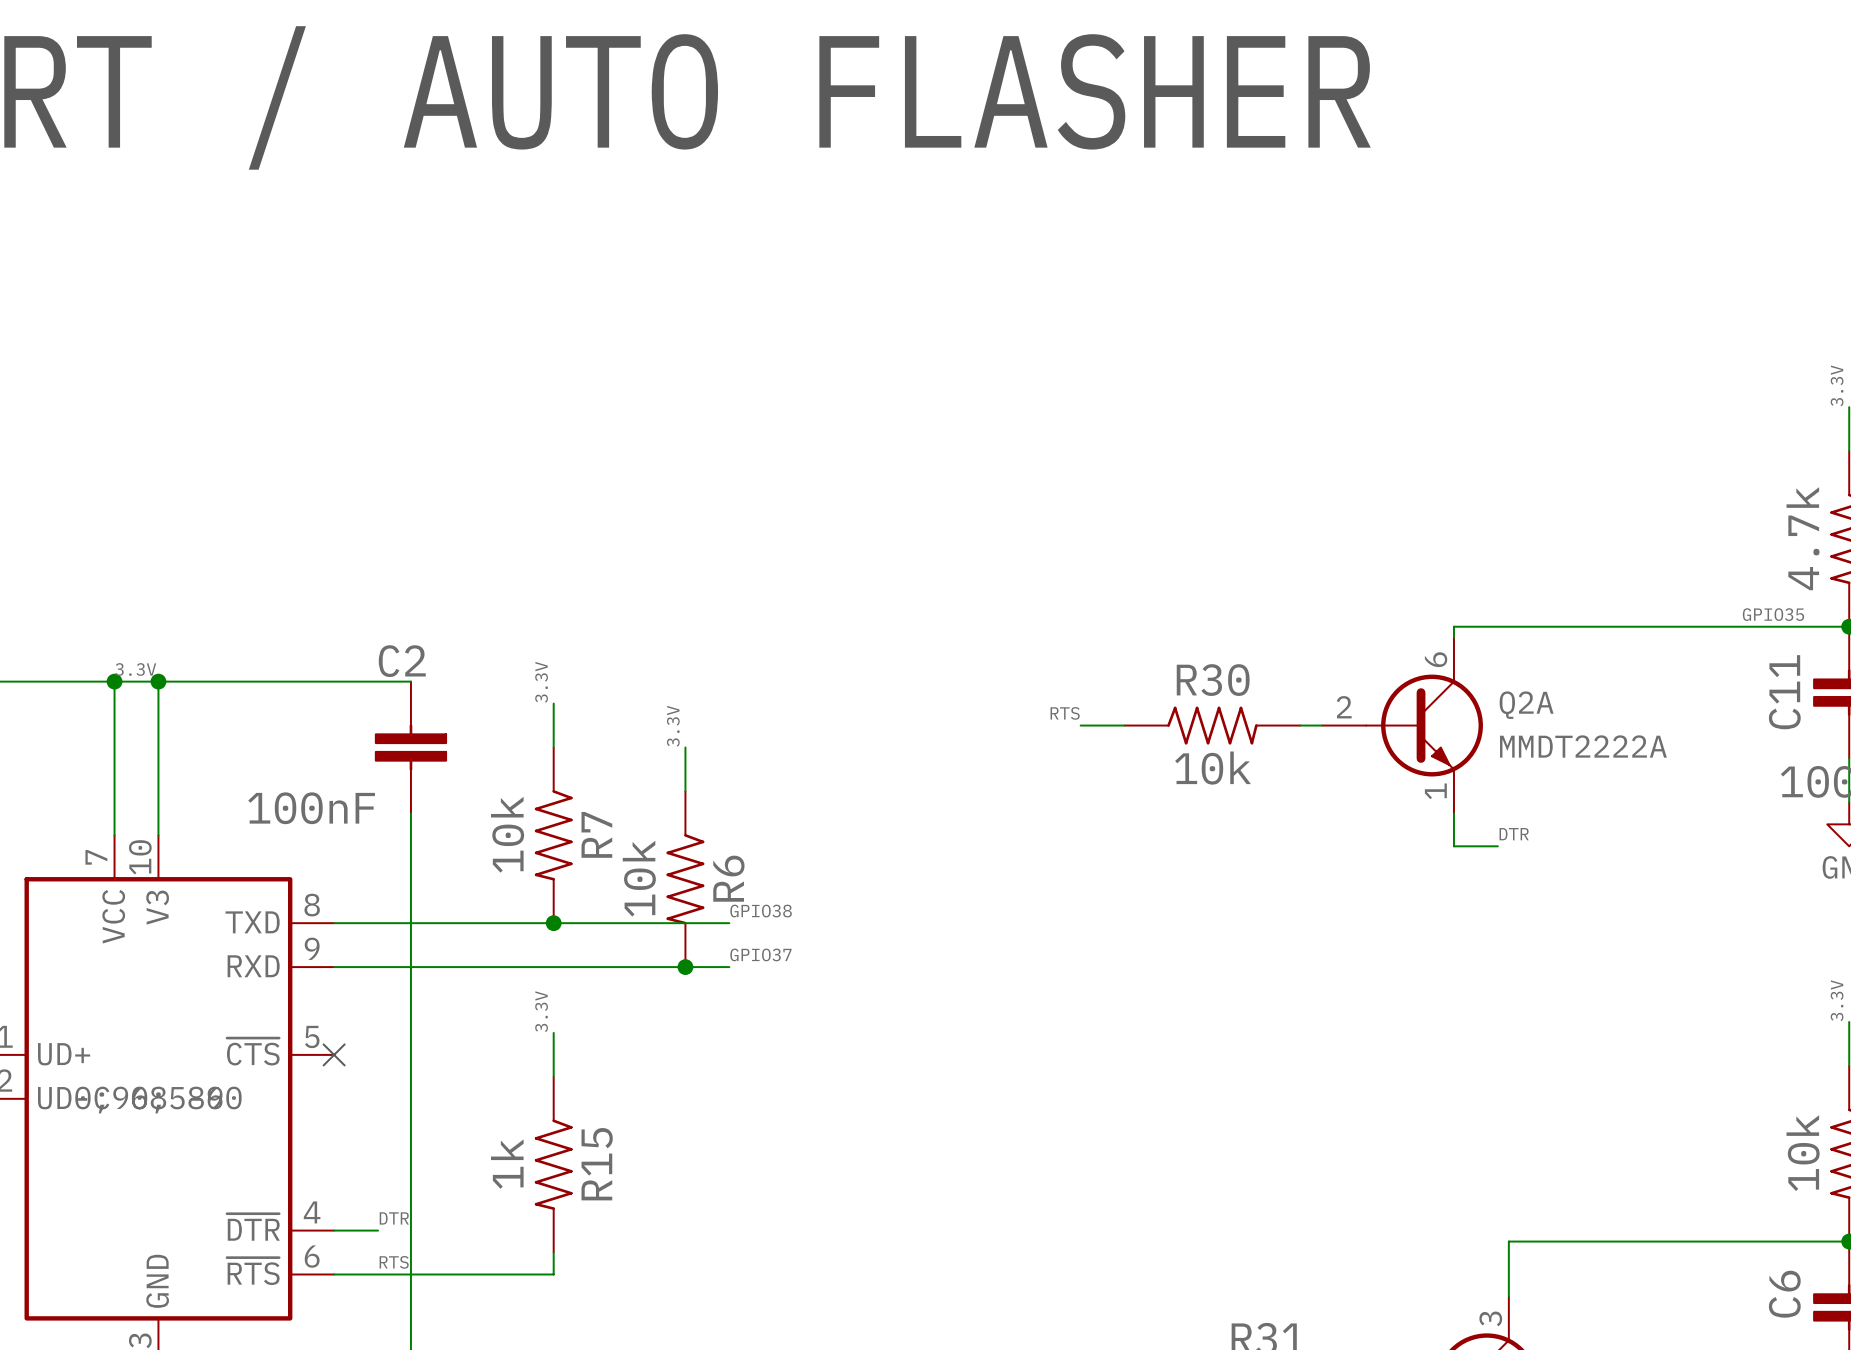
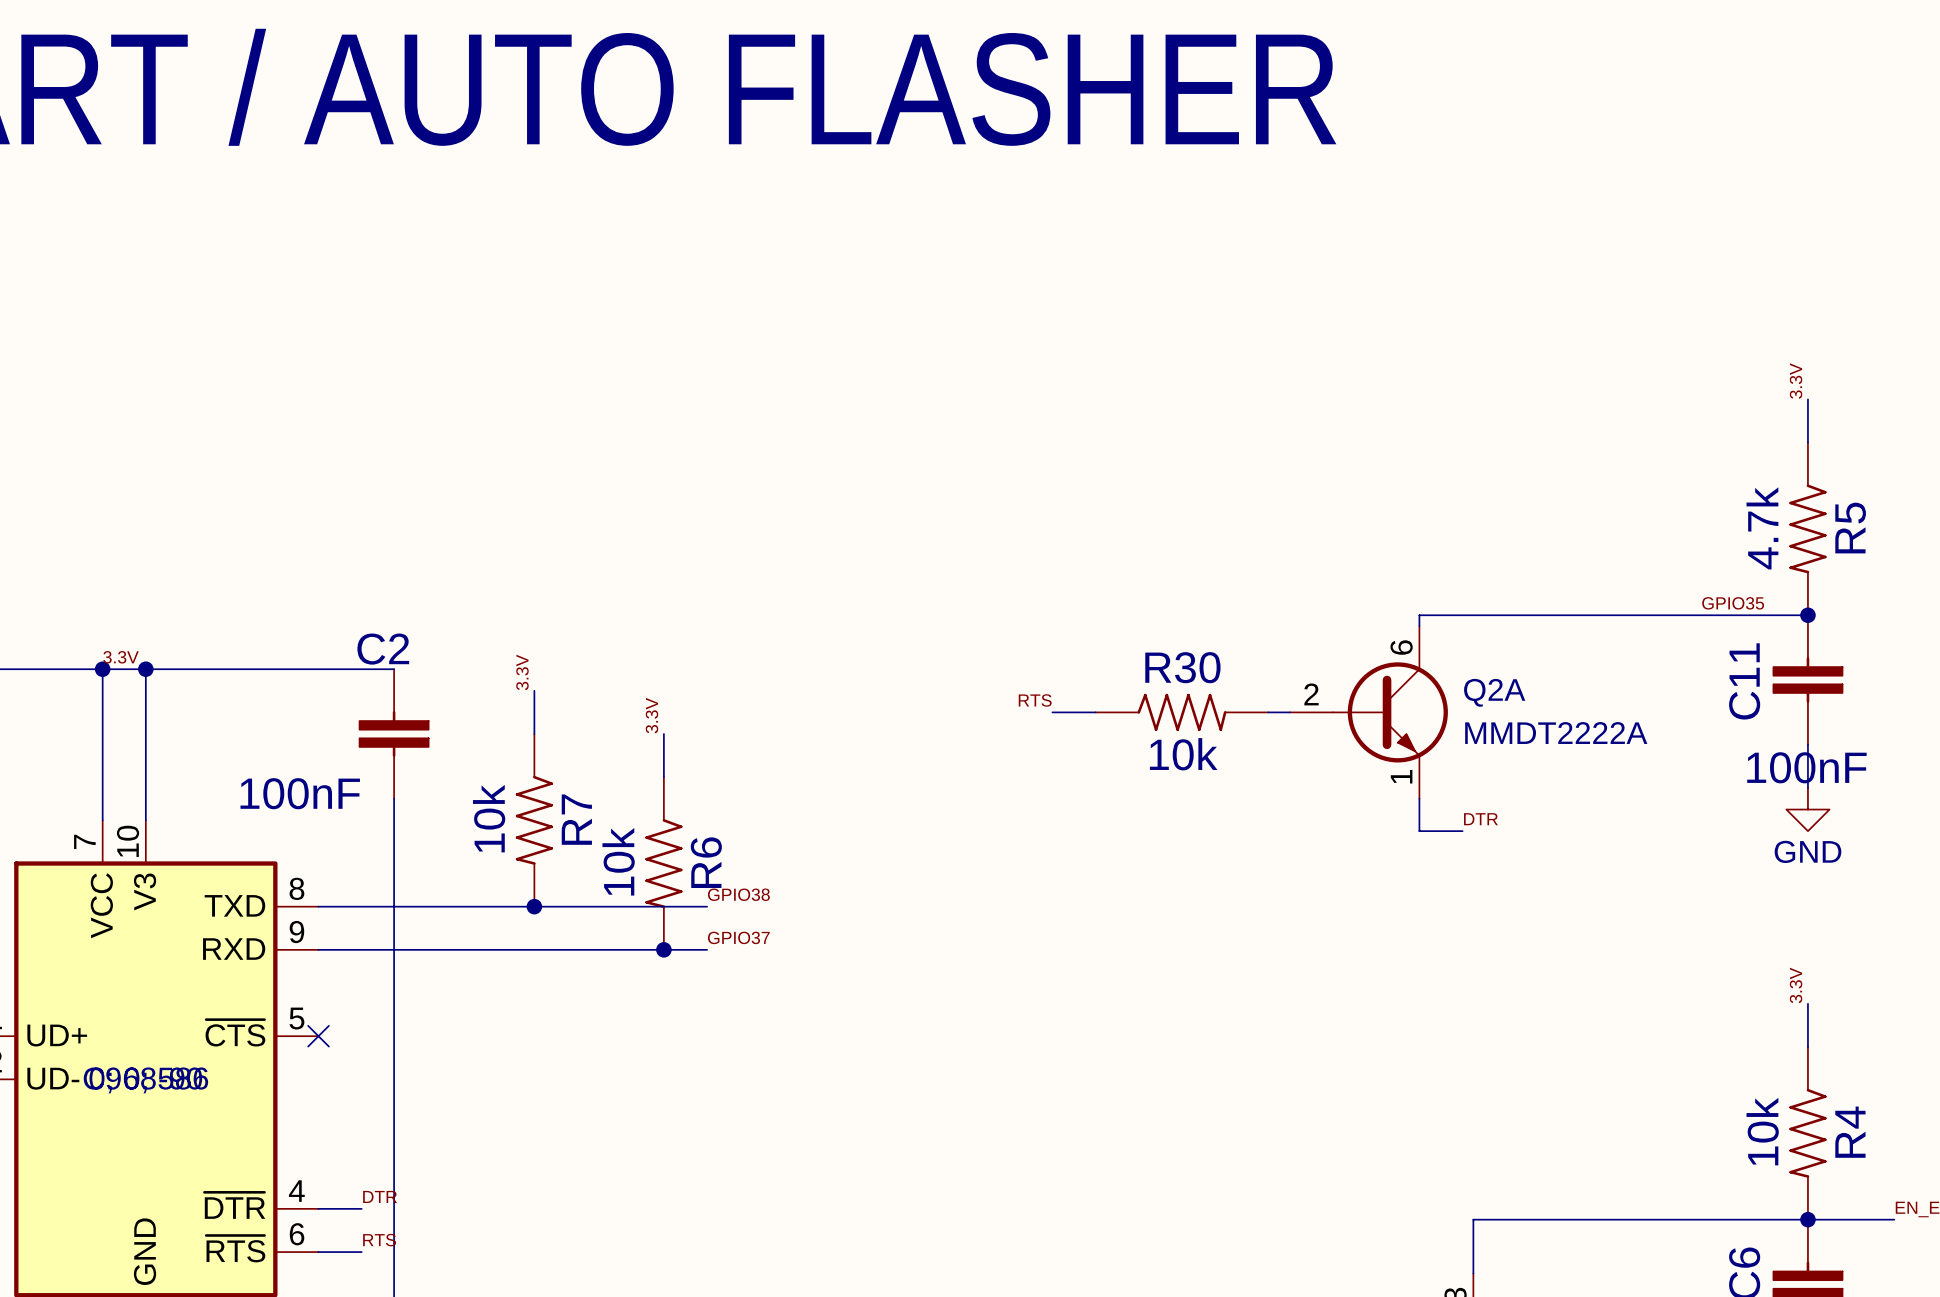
label: 3.3V (541, 1011) -> none
wire: (553, 1032) (553, 1076) -> none
R15: 1k (553, 1164) -> none
wire: (553, 1252) (553, 1274) (378, 1274) -> none

